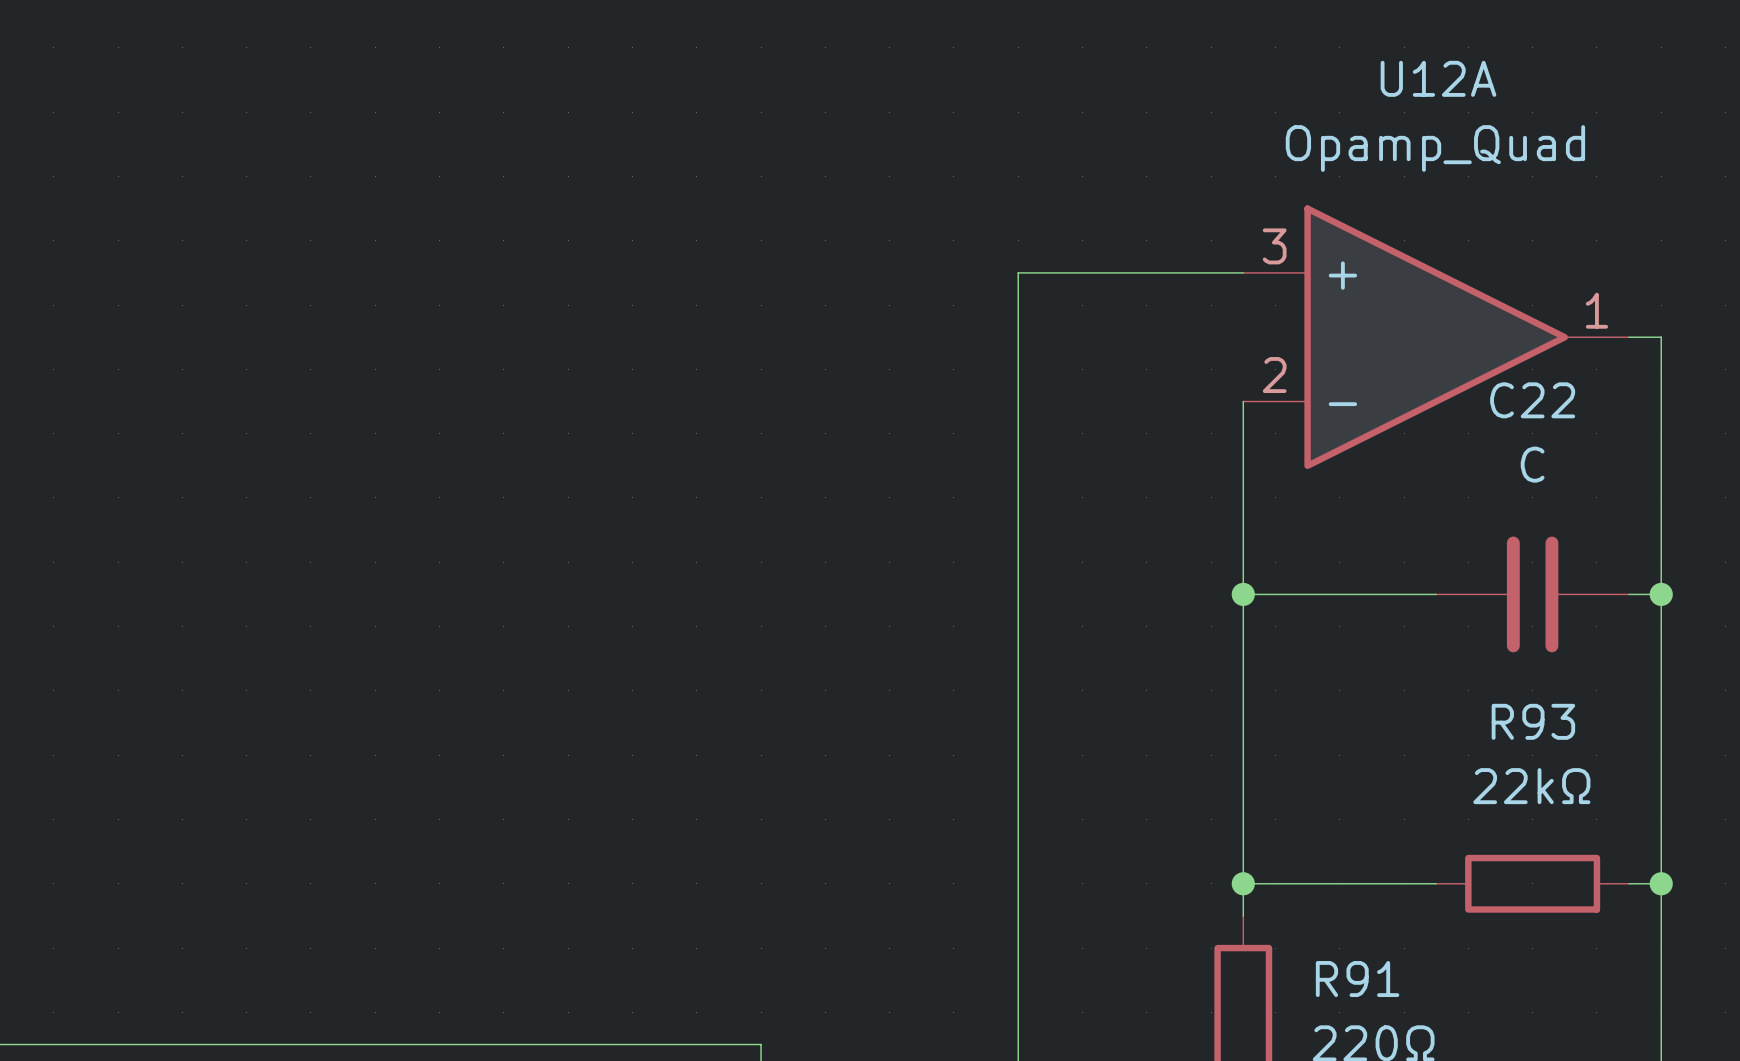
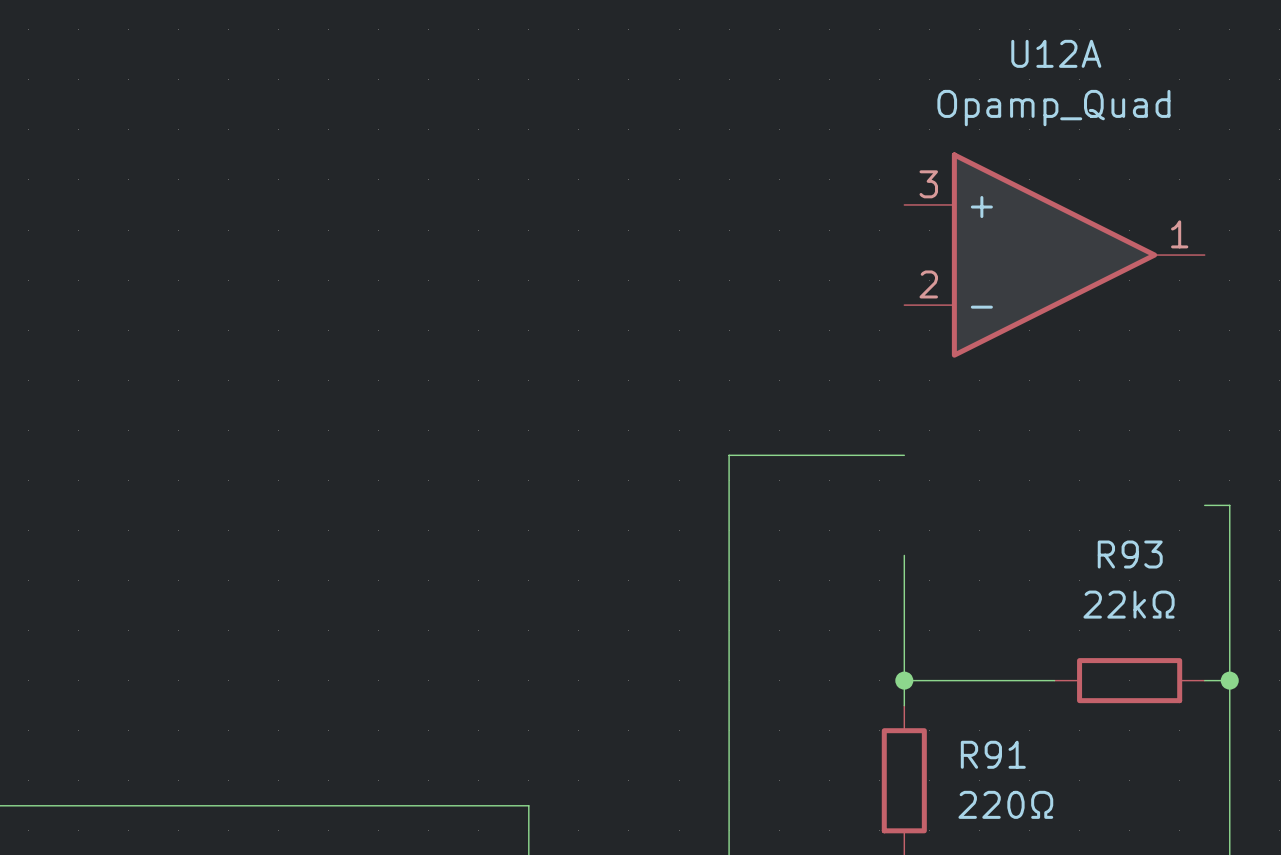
wire: (1243, 272) (1018, 272) (1018, 594) -> (904, 455) (729, 455)
wire: (1629, 337) (1661, 337) (1661, 658) -> (1204, 505) (1229, 505)
wire: (1243, 401) (1243, 723) -> none
wire: (1243, 594) (1436, 594) -> none
junction: (1243, 594) -> none
C22: C (1532, 594) -> none
wire: (1629, 594) (1661, 594) -> none
junction: (1661, 594) -> none

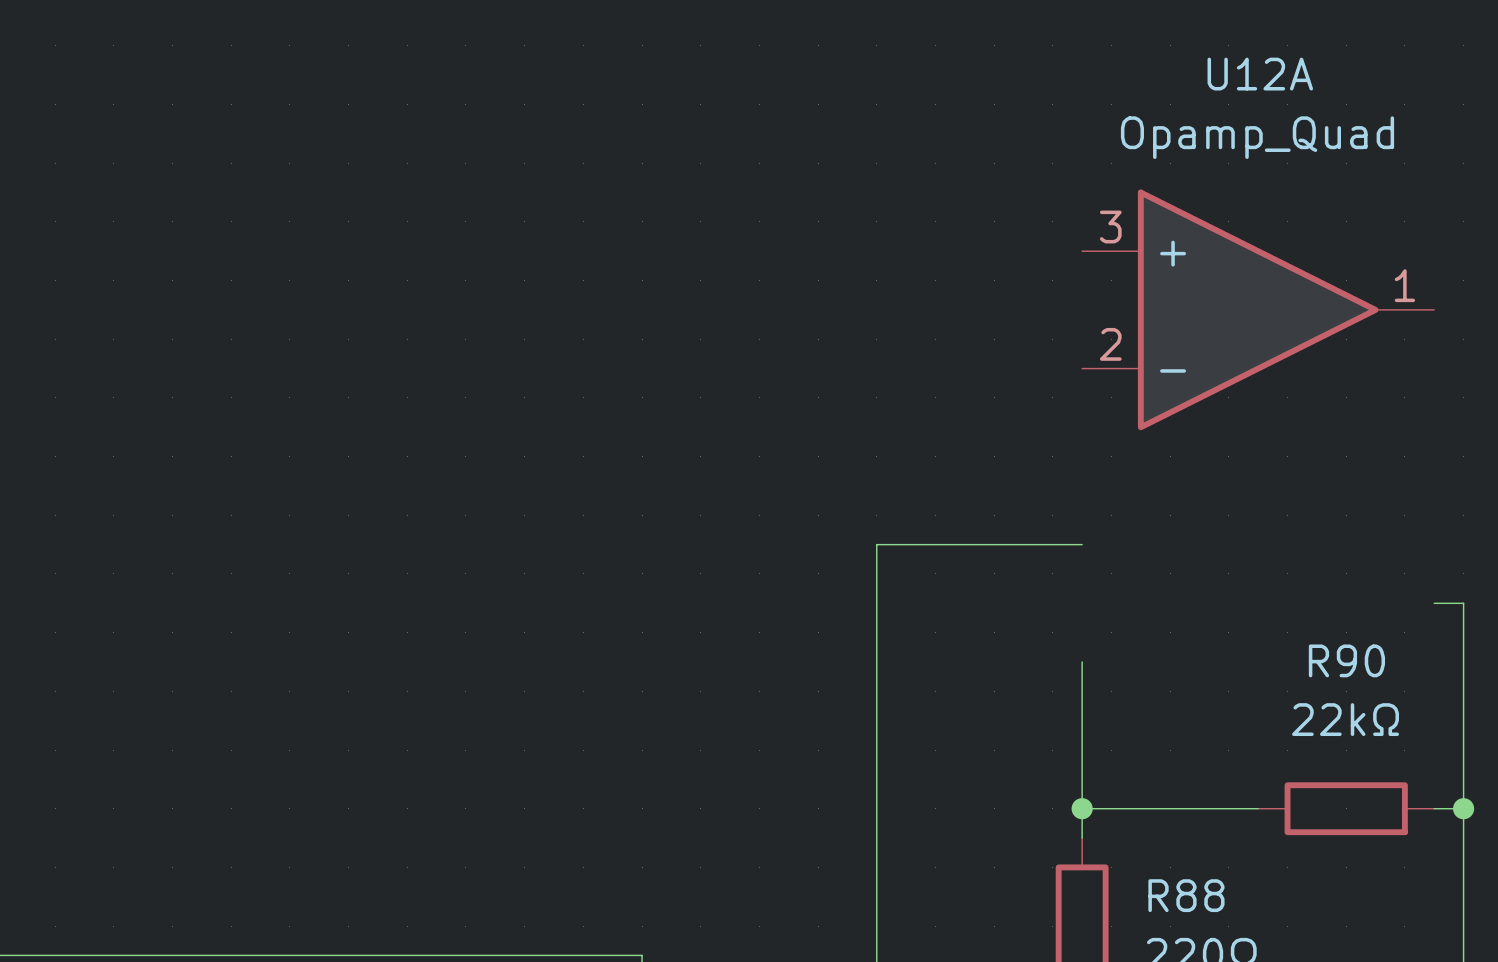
R93 name: R93 (1130, 554) -> R90 (1346, 660)
R91 name: R91 (993, 754) -> R88 (1186, 895)

